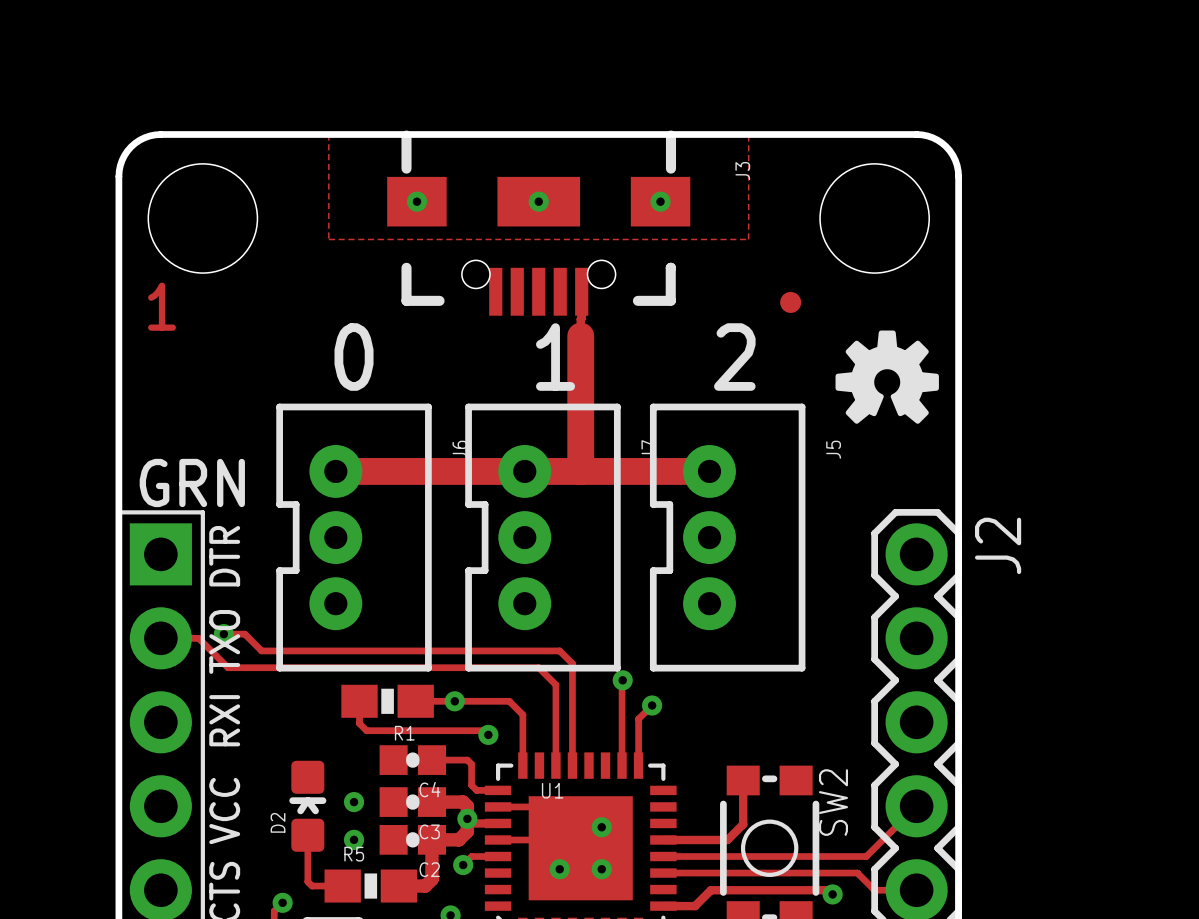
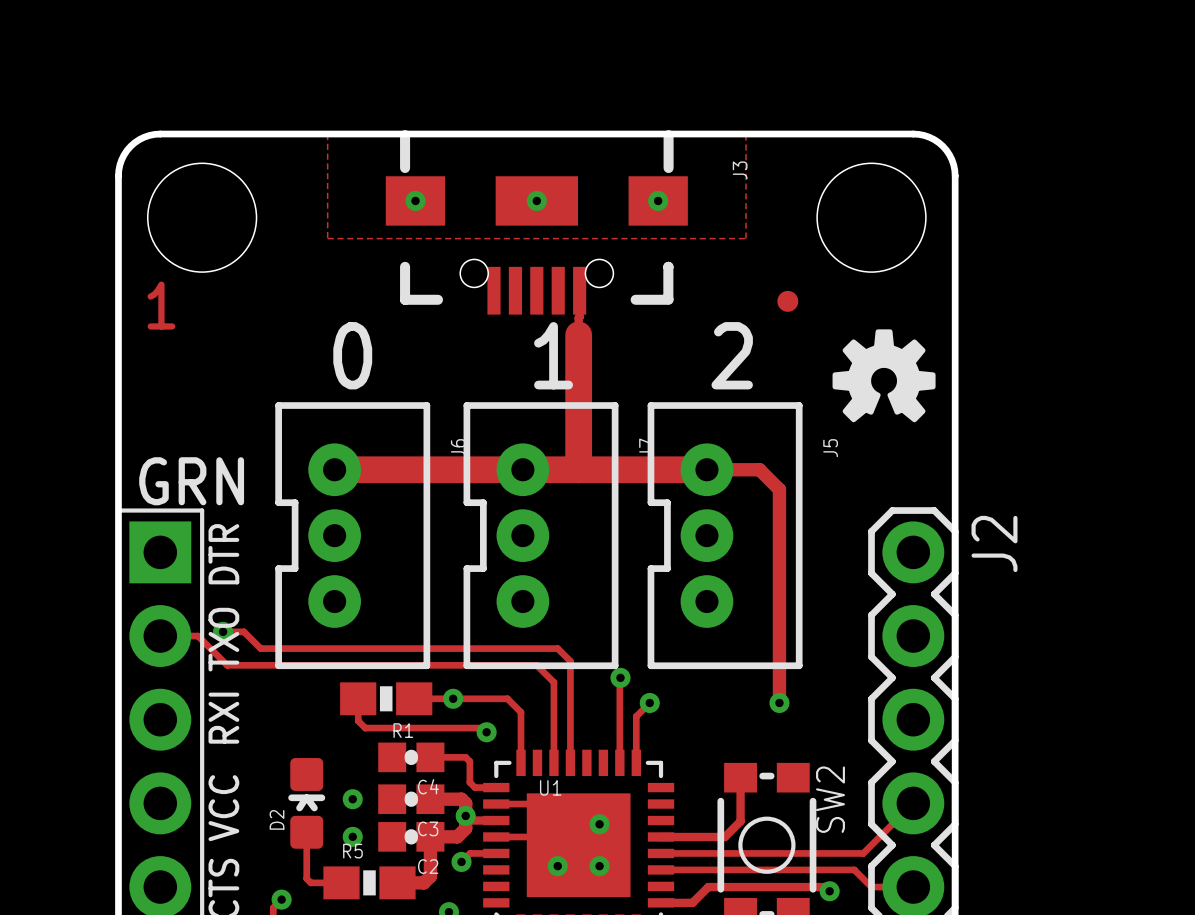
track: none -> (706, 469) (759, 469) (779, 489) (779, 702)
via: none -> (779, 702)

